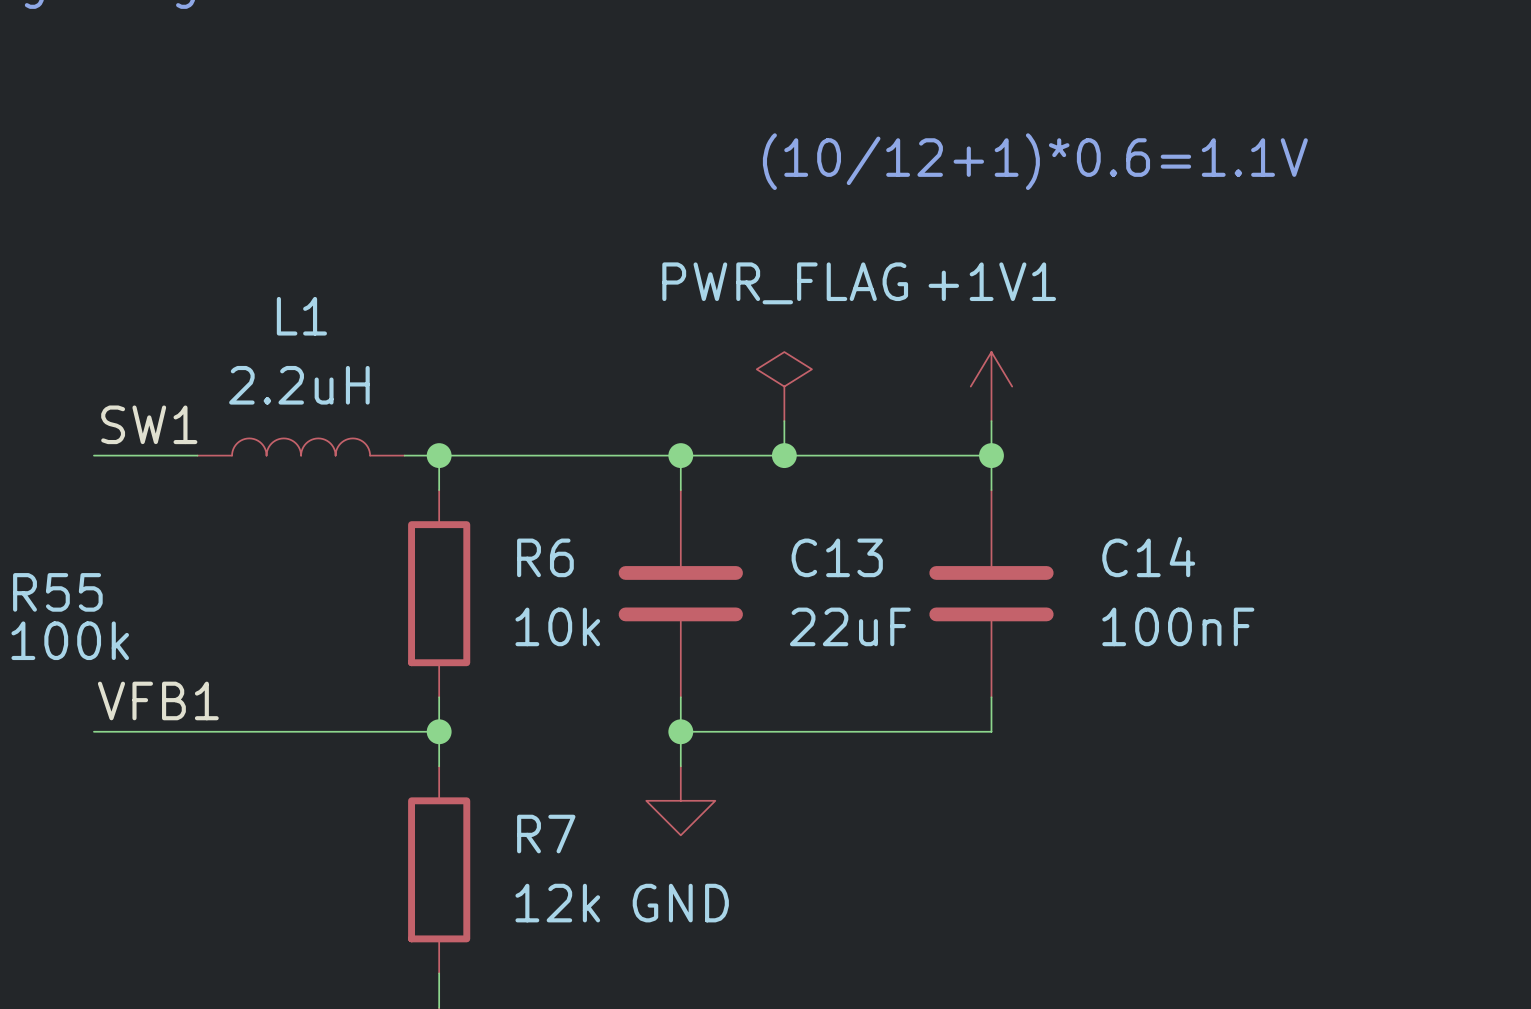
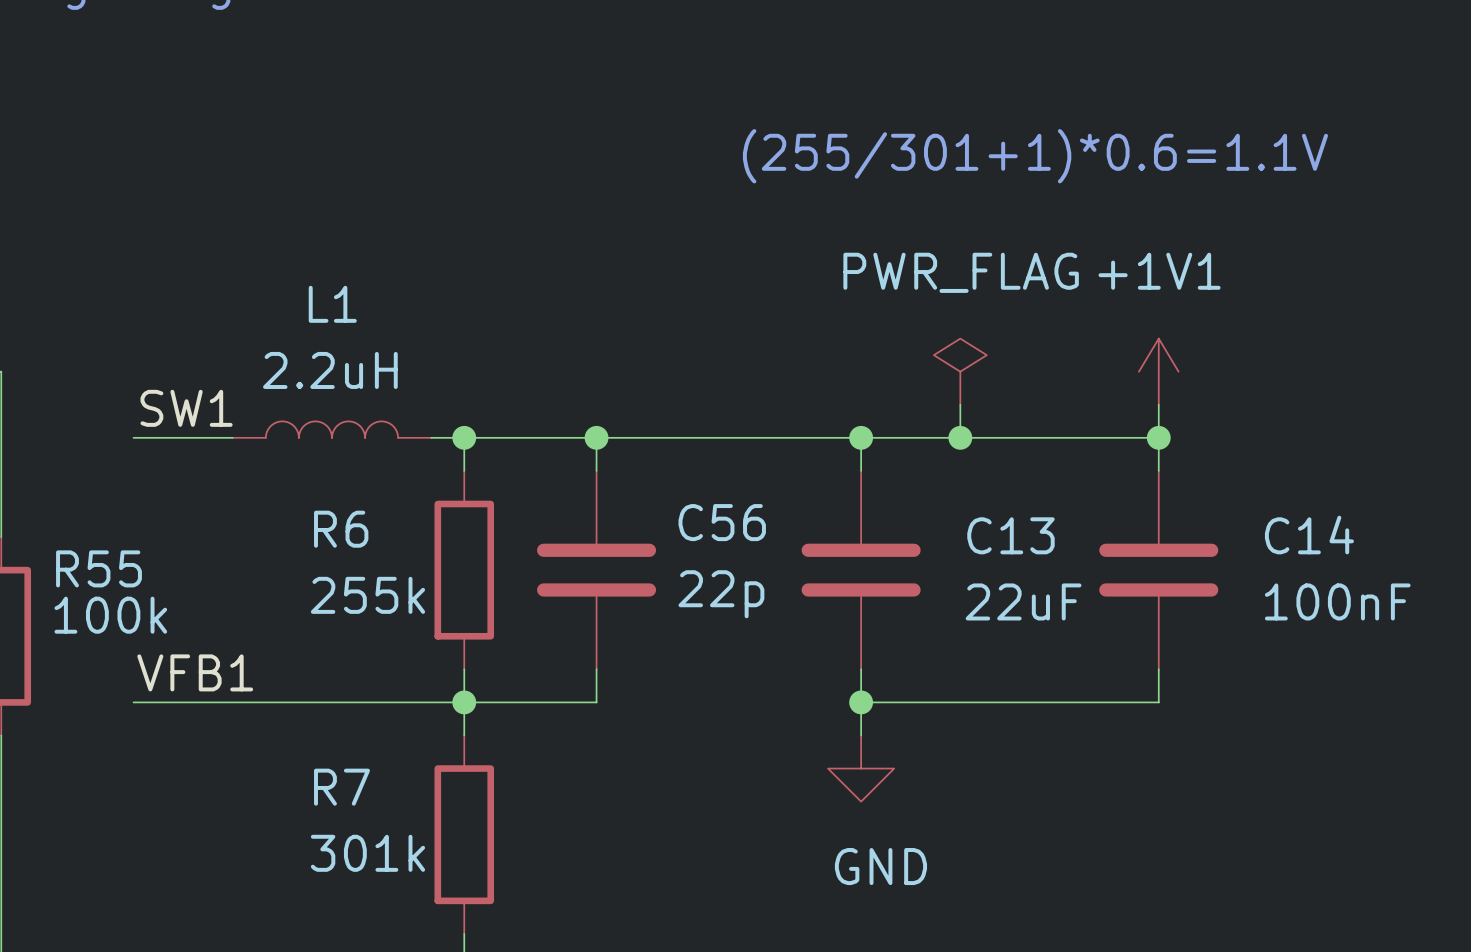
text: (10/12+1)*0.6=1.1V (1035, 161) -> (255/301+1)*0.6=1.1V (1035, 156)
power symbol position: PWR_FLAG (784, 386) -> PWR_FLAG (960, 371)
power symbol position: +1V1 (991, 386) -> +1V1 (1158, 371)
wire: (784, 421) (784, 455) -> (960, 404) (960, 437)
wire: (991, 421) (991, 490) -> (1158, 404) (1158, 470)
wire: none -> (596, 437) (596, 470)
junction: none -> (596, 437)
wire: (680, 455) (680, 490) -> (861, 437) (861, 470)
junction: (680, 455) -> none
junction: (784, 455) -> none
junction: none -> (861, 437)
junction position: (991, 455) -> (960, 437)
junction: none -> (1158, 437)
R6 name position: R6 (545, 557) -> R6 (341, 529)
C56: none -> 22p (596, 570)
C13 position: (680, 593) -> (861, 570)
C14 position: (991, 593) -> (1158, 570)
R6 value: 10k (557, 626) -> 255k (367, 595)
wire: none -> (596, 669) (596, 702) (464, 702)
wire: (680, 697) (680, 766) -> (861, 669) (861, 735)
wire: (991, 697) (991, 731) -> (1158, 669) (1158, 702) (993, 702)
wire: (680, 731) (853, 731) -> (993, 437) (1158, 437)
junction: (680, 731) -> none
junction: none -> (861, 702)
power symbol position: GND (680, 800) -> GND (861, 768)
R7 name position: R7 (546, 834) -> R7 (341, 787)
R7 value: 12k (557, 903) -> 301k (367, 853)
power symbol text position: GND (680, 903) -> GND (880, 866)

